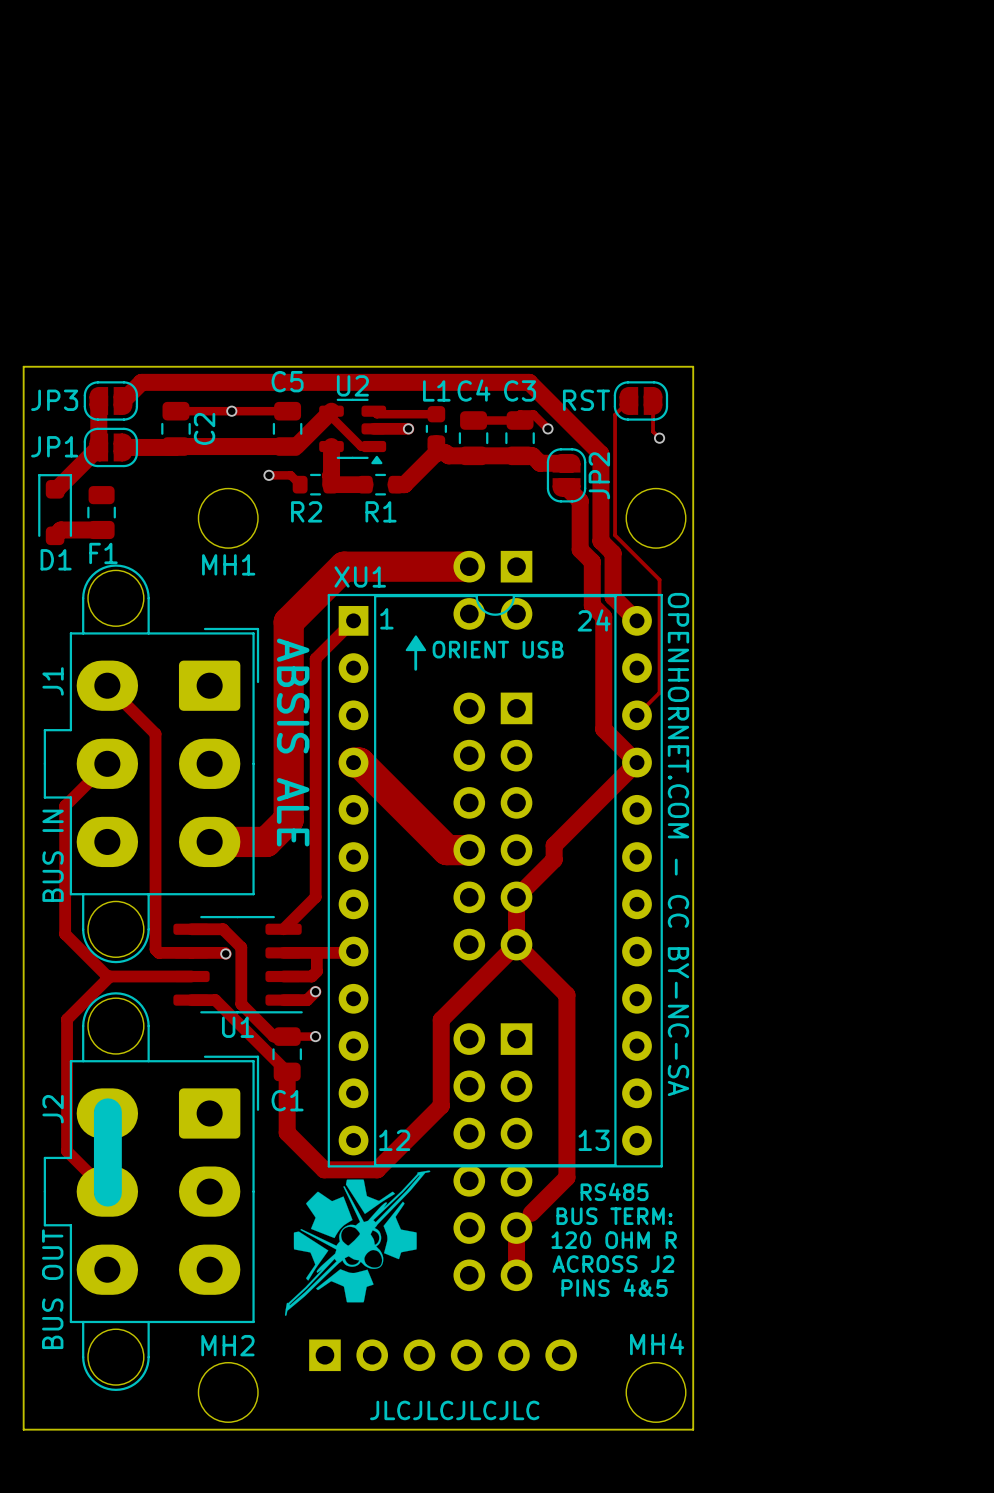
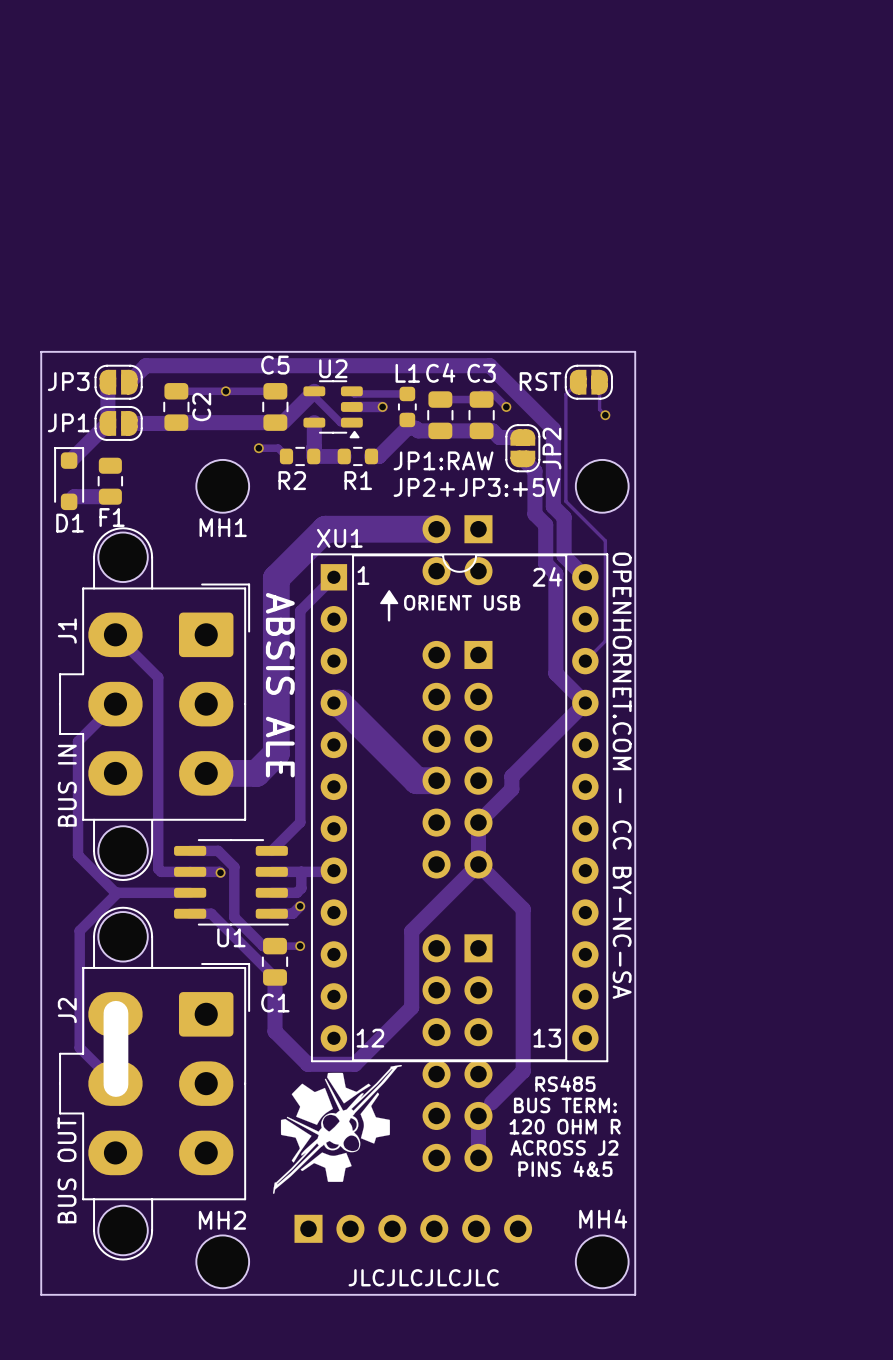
text: none -> JP1:RAW (443, 460)
text: none -> JP2+JP3:+5V (476, 487)

